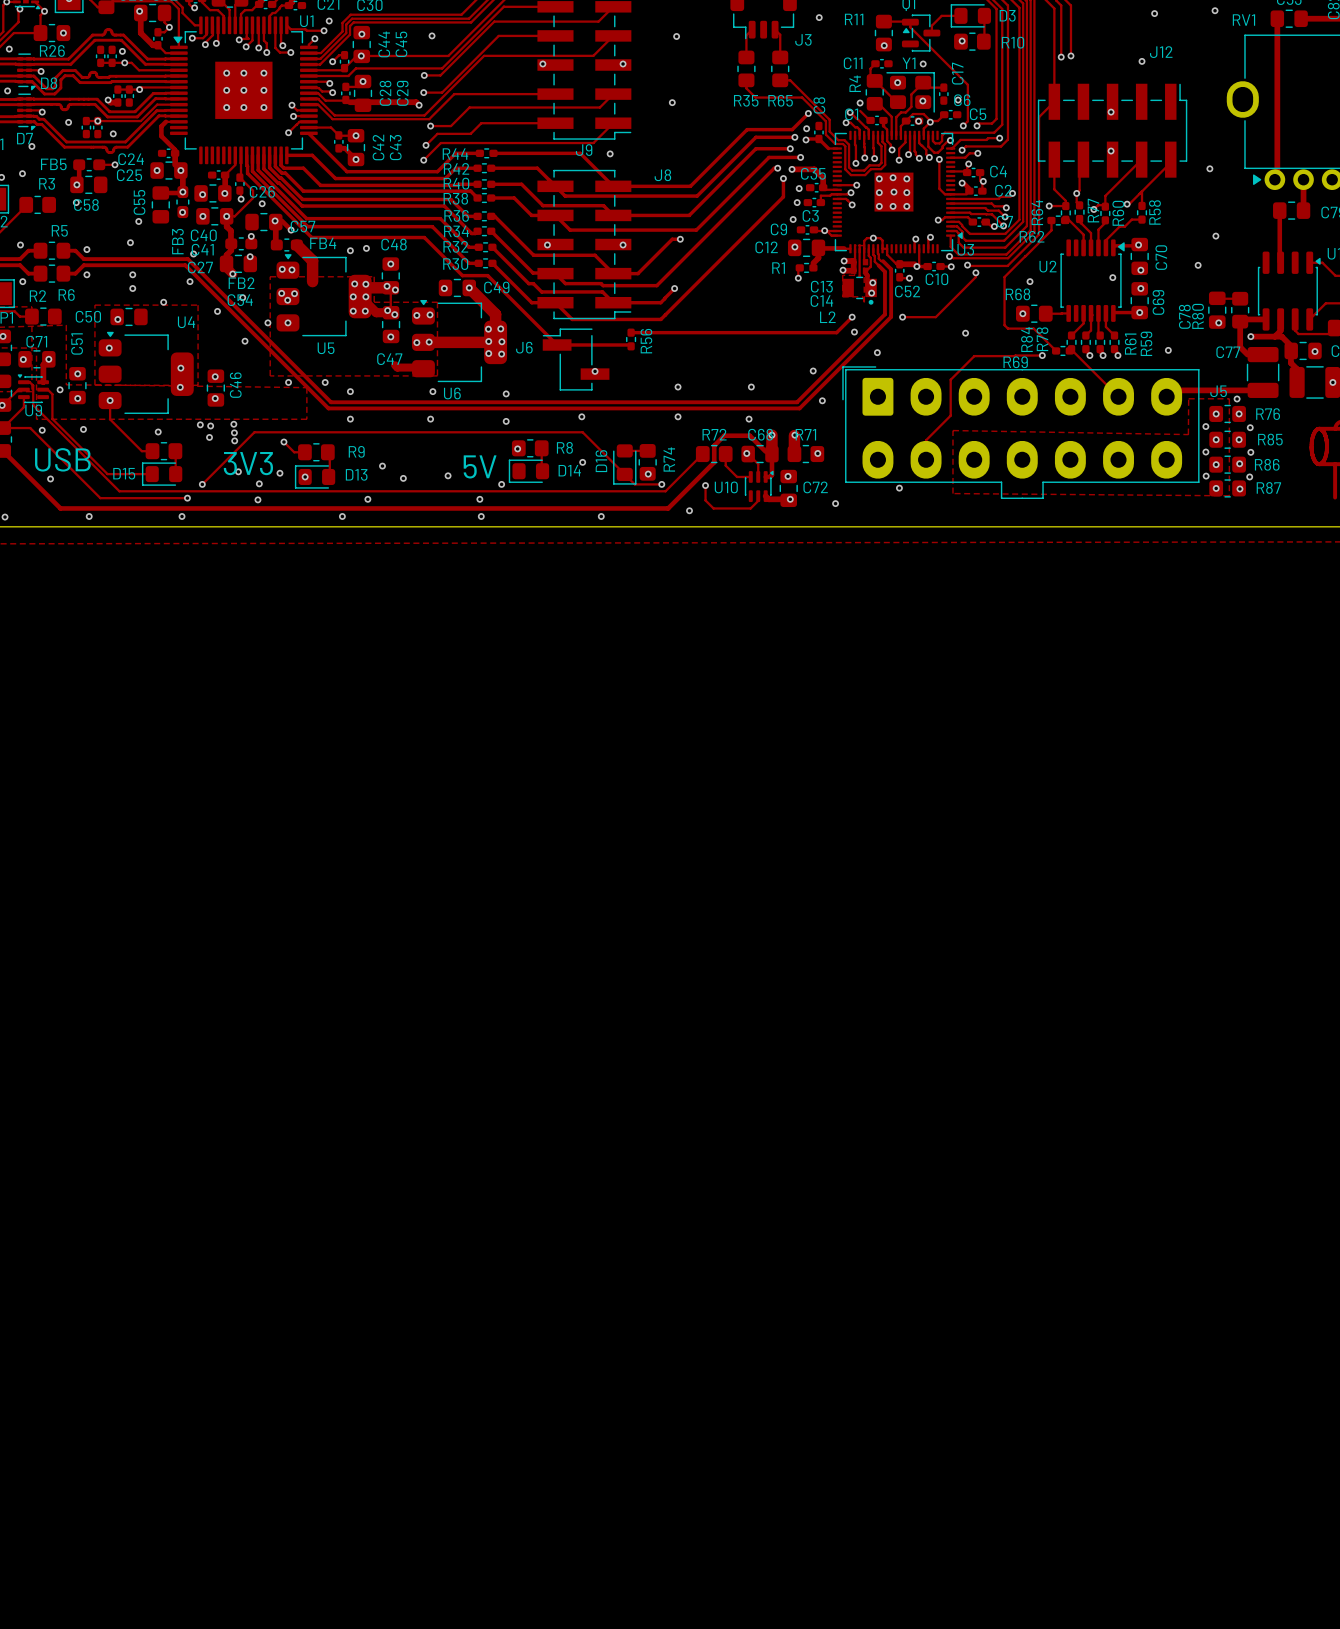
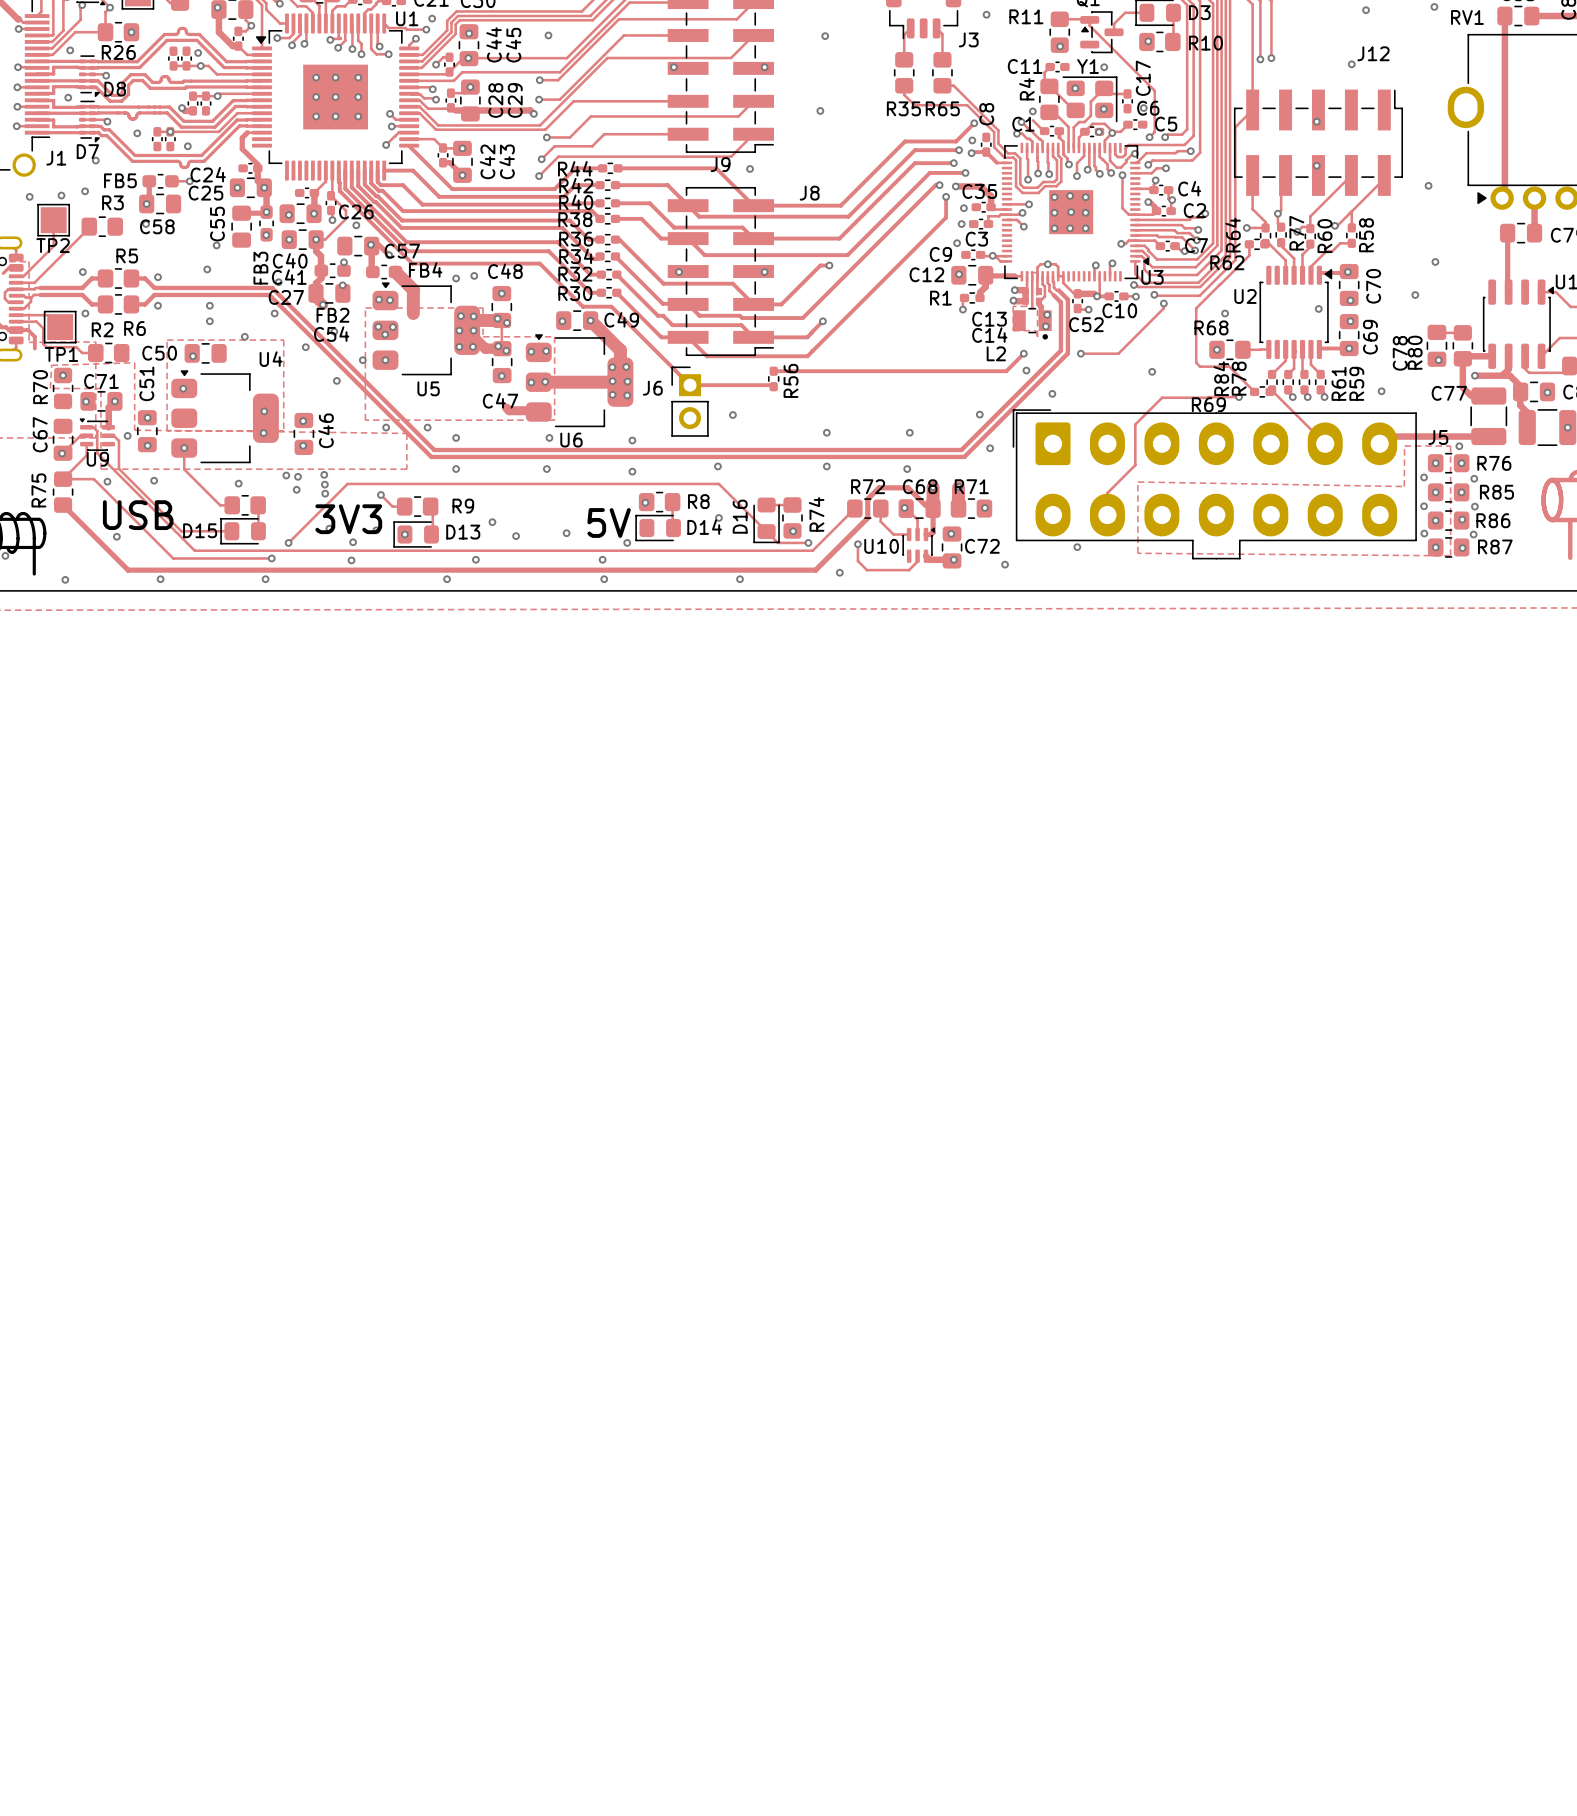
J6 footprint: [542, 328, 610, 391] -> [671, 366, 709, 437]

